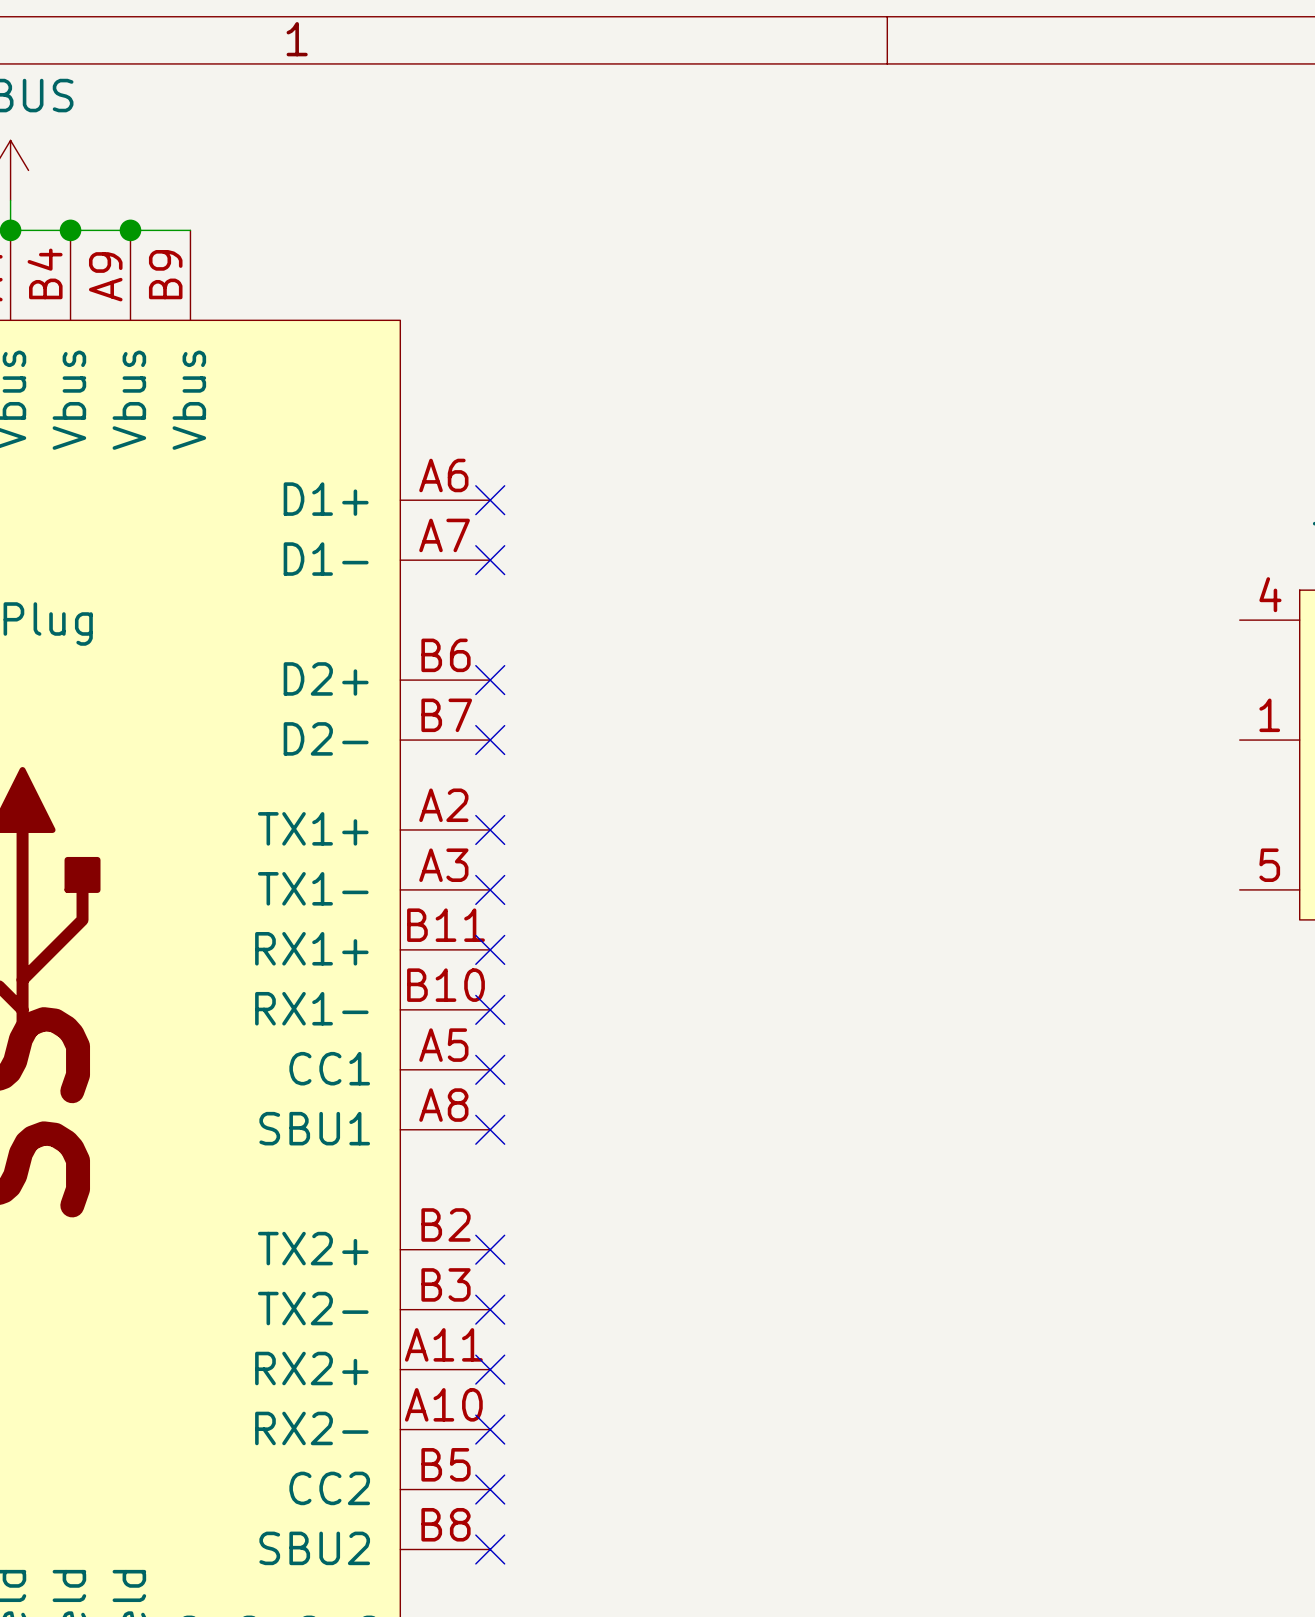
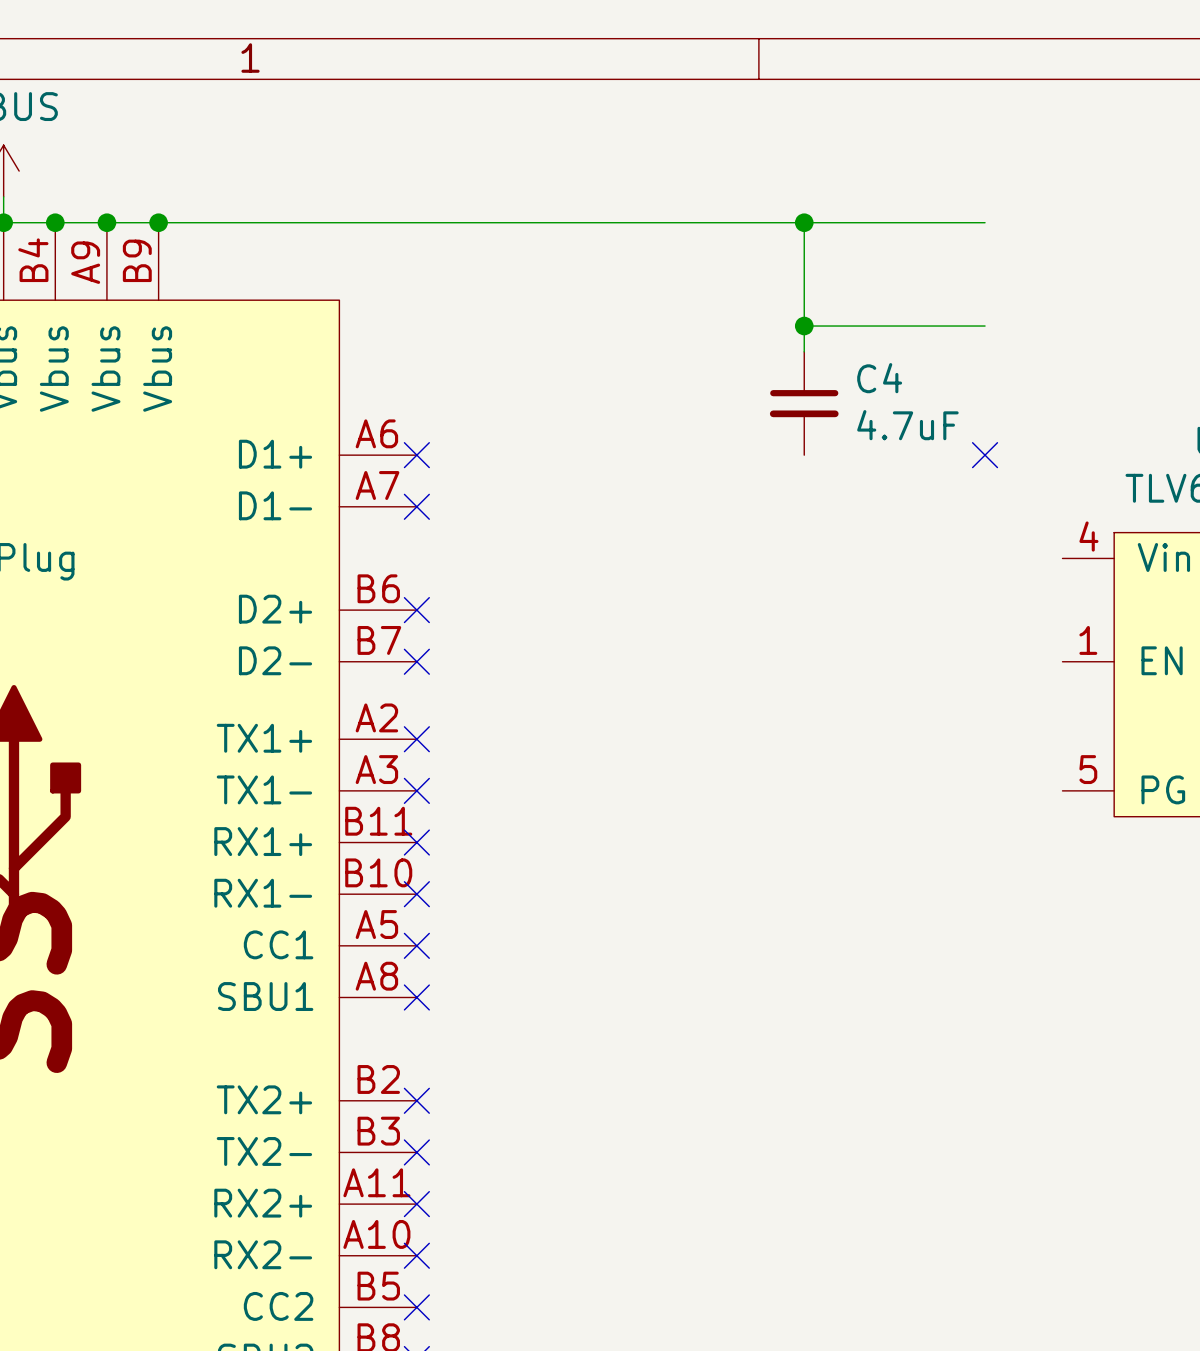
wire: none -> (158, 222) (985, 222)
junction: none -> (158, 222)
wire: none -> (804, 222) (804, 351)
junction: none -> (804, 222)
wire: none -> (804, 326) (985, 326)
junction: none -> (804, 326)
C4: none -> 4.7uF (804, 403)
no-connect mark: none -> (985, 455)

